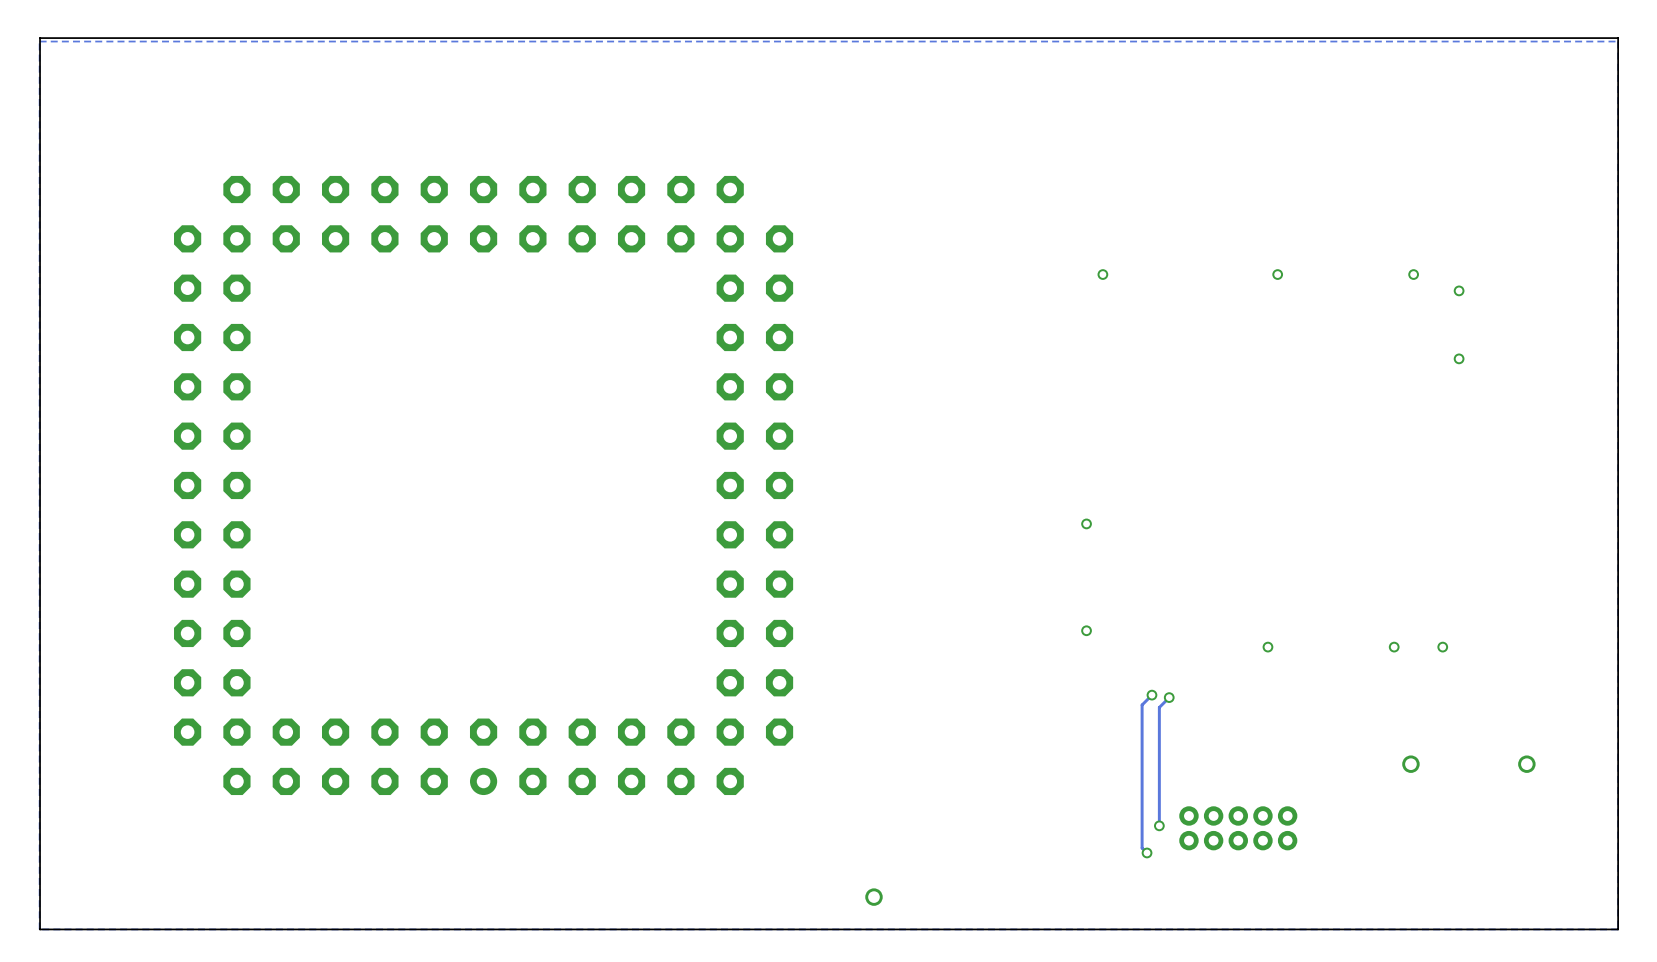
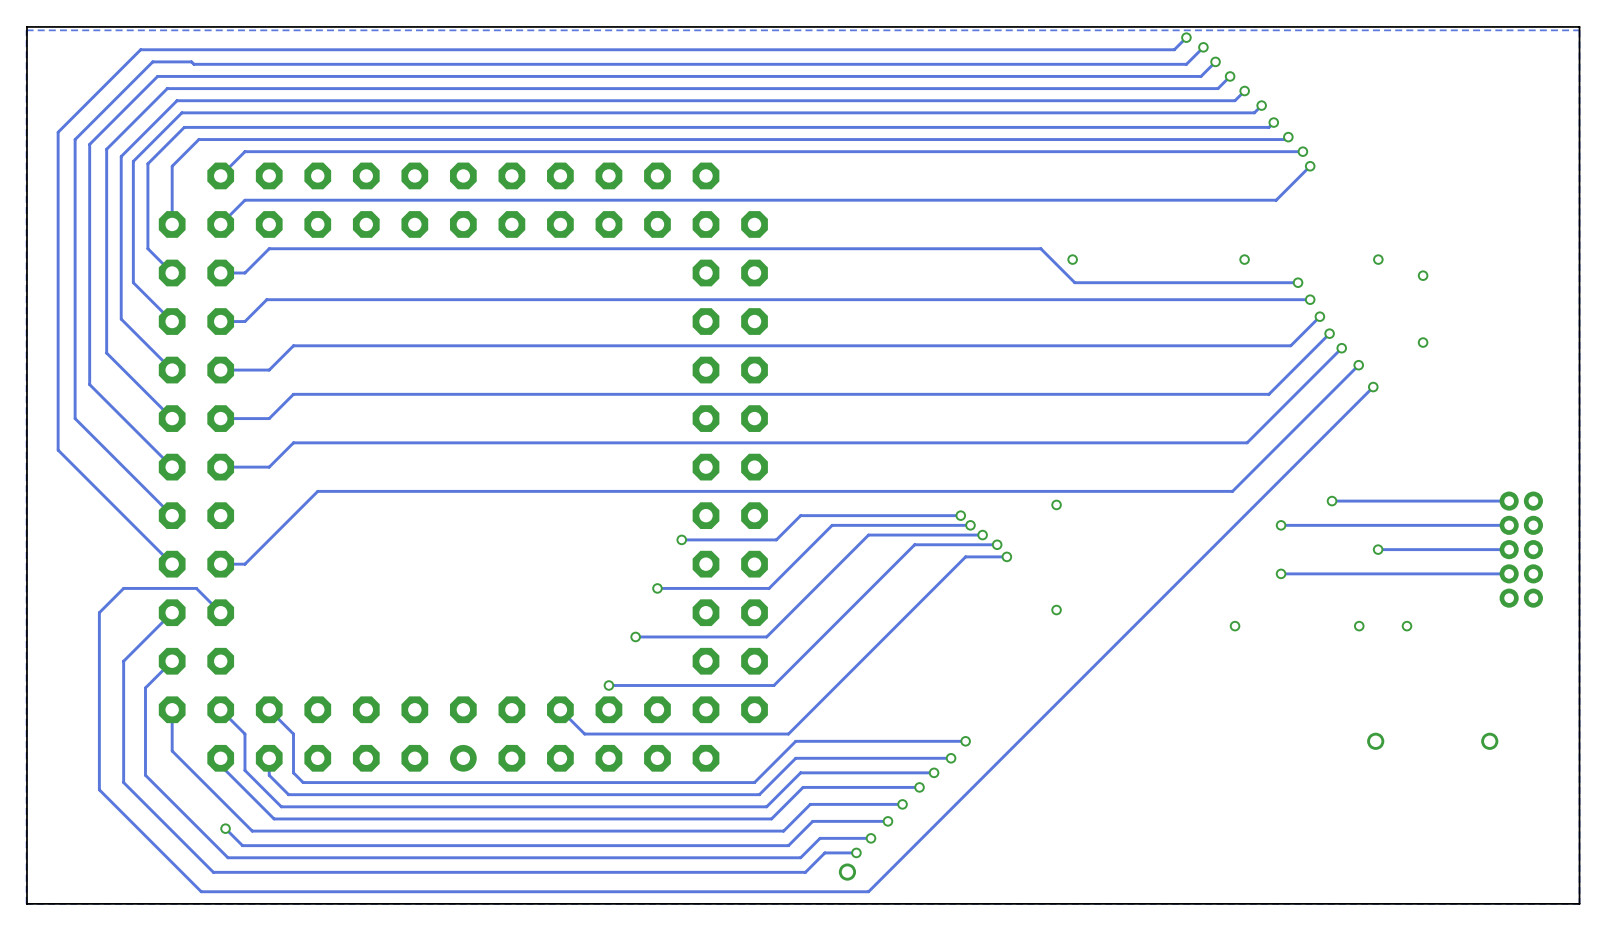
track: none -> (1186, 37) (1174, 49) (140, 49) (58, 132) (58, 450) (172, 564)
via: none -> (1186, 37)
track: none -> (1203, 47) (1186, 64) (194, 64) (191, 61) (152, 61) (75, 139) (75, 418) (172, 515)
via: none -> (1203, 47)
track: none -> (1215, 61) (1201, 76) (157, 76) (89, 144) (89, 384) (172, 467)
via: none -> (1215, 61)
track: none -> (1230, 76) (1217, 88) (167, 88) (106, 149) (106, 353) (172, 418)
via: none -> (1230, 76)
track: none -> (1244, 91) (1234, 100) (177, 100) (121, 156) (121, 319) (172, 370)
via: none -> (1244, 91)
track: none -> (1261, 105) (1254, 112) (181, 112) (133, 161) (133, 282) (172, 321)
via: none -> (1261, 105)
track: none -> (1273, 122) (1268, 127) (184, 127) (147, 163) (147, 248) (172, 273)
via: none -> (1273, 122)
track: none -> (1288, 137) (1285, 139) (198, 139) (172, 166) (172, 224)
via: none -> (1288, 137)
track: none -> (1302, 151) (244, 151) (220, 175)
via: none -> (1302, 151)
track: none -> (1310, 166) (1276, 200) (244, 200) (220, 224)
via: none -> (1310, 166)
track: none -> (220, 273) (244, 273) (269, 248) (1040, 248) (1074, 282) (1298, 282)
via: none -> (1298, 282)
track: none -> (1310, 299) (266, 299) (244, 321) (220, 321)
via: none -> (1310, 299)
track: none -> (1319, 316) (1290, 345) (293, 345) (269, 370) (220, 370)
via: none -> (1319, 316)
track: none -> (1329, 333) (1268, 394) (293, 394) (269, 418) (220, 418)
via: none -> (1329, 333)
track: none -> (1341, 348) (1247, 442) (293, 442) (269, 467) (220, 467)
via: none -> (1341, 348)
track: none -> (1358, 365) (1232, 491) (317, 491) (244, 564) (220, 564)
via: none -> (1358, 365)
track: none -> (1373, 387) (868, 891) (201, 891) (99, 789) (99, 612) (123, 588) (196, 588) (220, 612)
via: none -> (1373, 387)
via: none -> (1332, 501)
track: none -> (1509, 501) (1332, 501)
track: none -> (960, 515) (800, 515) (776, 539) (681, 539)
via: none -> (960, 515)
track: none -> (970, 525) (832, 525) (769, 588) (657, 588)
via: none -> (970, 525)
via: none -> (1281, 525)
track: none -> (1509, 525) (1281, 525)
track: none -> (982, 535) (868, 535) (766, 636) (635, 636)
via: none -> (982, 535)
via: none -> (681, 539)
track: none -> (997, 544) (914, 544) (773, 685) (608, 685)
via: none -> (997, 544)
via: none -> (1378, 549)
track: none -> (1509, 549) (1378, 549)
track: none -> (1006, 556) (965, 556) (788, 734) (584, 734) (560, 709)
via: none -> (1006, 556)
via: none -> (1281, 573)
track: none -> (1509, 573) (1281, 573)
via: none -> (657, 588)
track: none -> (172, 612) (123, 661) (123, 782) (213, 872) (805, 872) (824, 852) (856, 852)
via: none -> (635, 636)
track: none -> (172, 661) (145, 687) (145, 775) (227, 857) (800, 857) (820, 838) (871, 838)
track: (1151, 695) (1142, 704) (1142, 848) (1147, 852) -> none
via: (1151, 695) -> none
track: (1169, 697) (1159, 707) (1159, 825) -> none
via: (1169, 697) -> none
via: none -> (608, 685)
track: none -> (172, 709) (172, 751) (252, 831) (783, 831) (810, 804) (902, 804)
track: none -> (220, 709) (244, 734) (244, 770) (281, 806) (766, 806) (800, 772) (934, 772)
track: none -> (269, 709) (293, 734) (293, 772) (303, 782) (754, 782) (795, 741) (965, 741)
via: none -> (965, 741)
track: none -> (220, 758) (220, 765) (274, 818) (771, 818) (803, 787) (919, 787)
track: none -> (951, 758) (795, 758) (759, 794) (288, 794) (269, 775) (269, 758)
via: none -> (951, 758)
via: none -> (934, 772)
via: none -> (919, 787)
via: (1159, 825) -> none
via: none -> (902, 804)
part rotation: 0° (1238, 828) -> 90° clockwise (1521, 549)
part position: (1238, 828) -> (1521, 549)
track: none -> (887, 821) (812, 821) (788, 845) (242, 845) (225, 828)
via: none -> (887, 821)
via: none -> (225, 828)
via: (1147, 852) -> none
via: none -> (871, 838)
via: none -> (856, 852)

